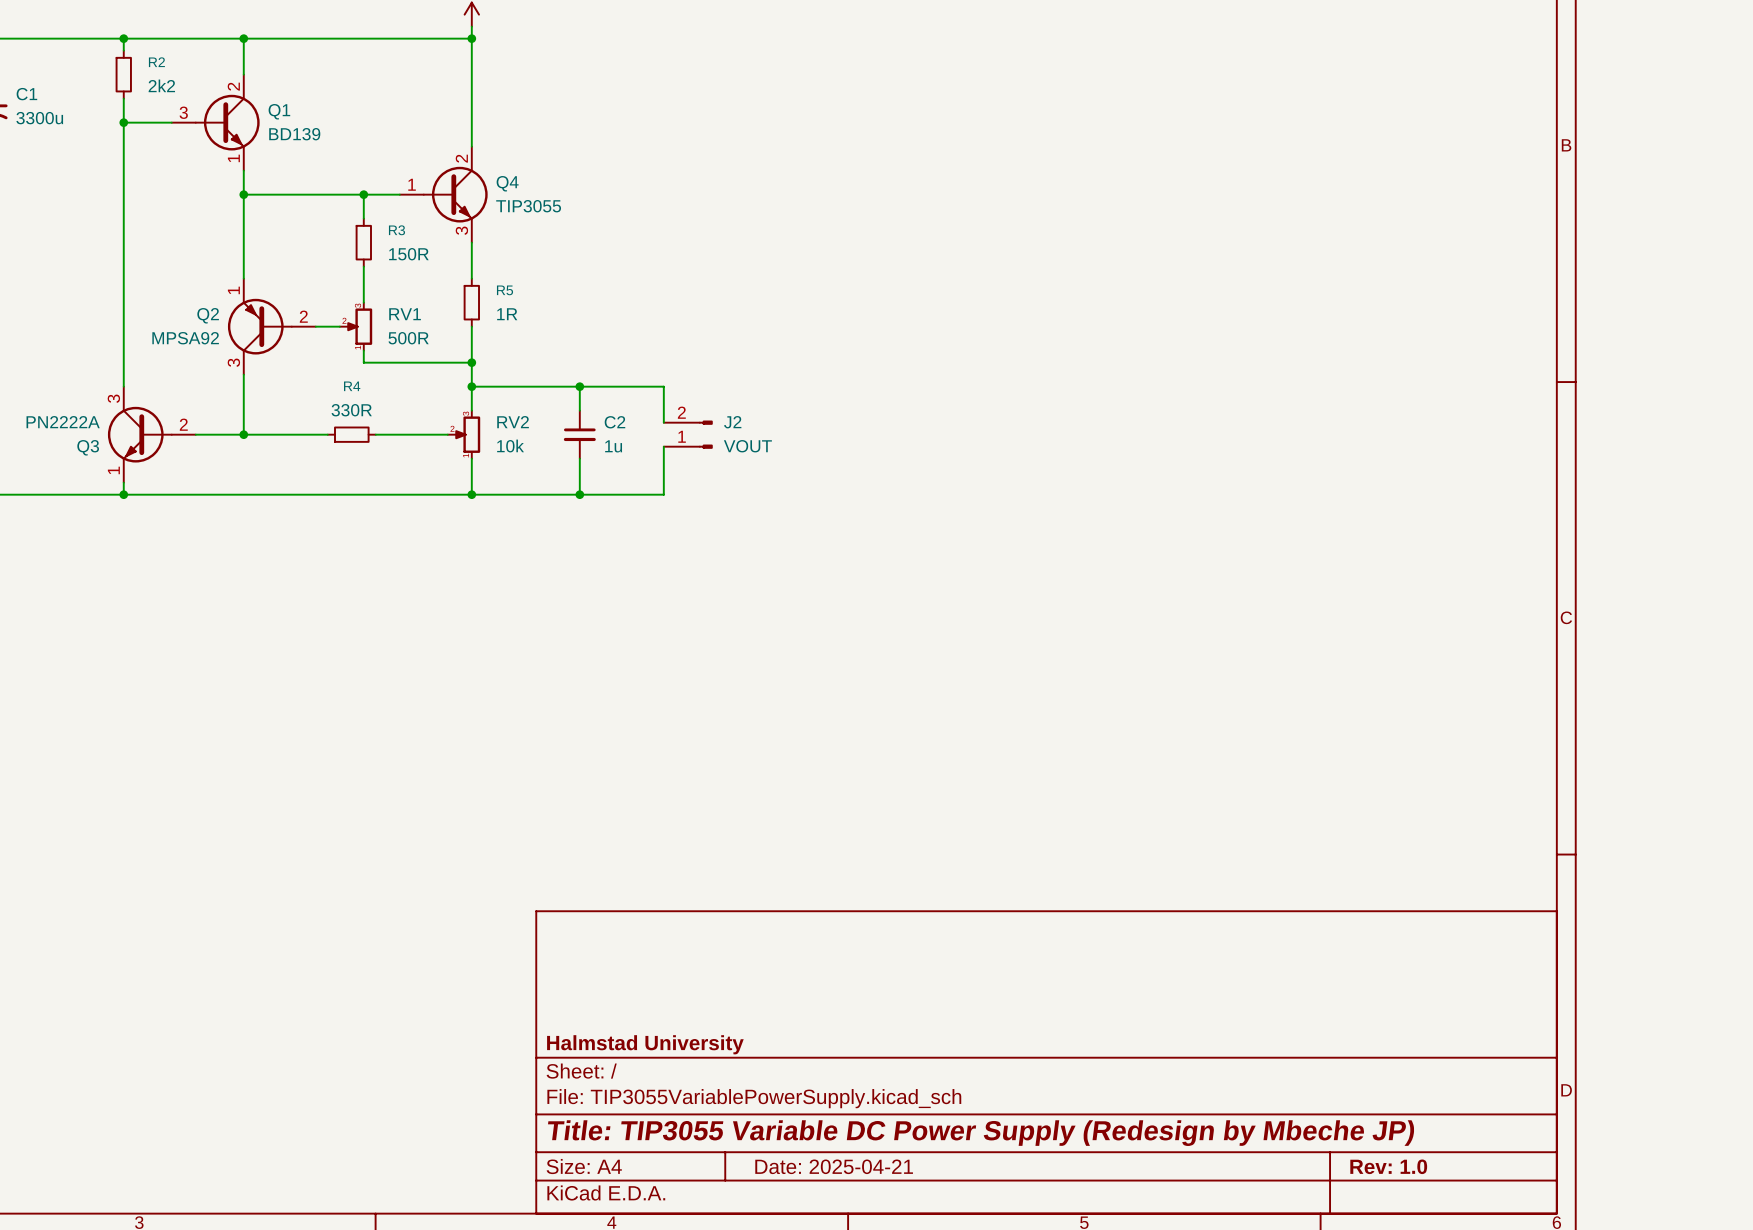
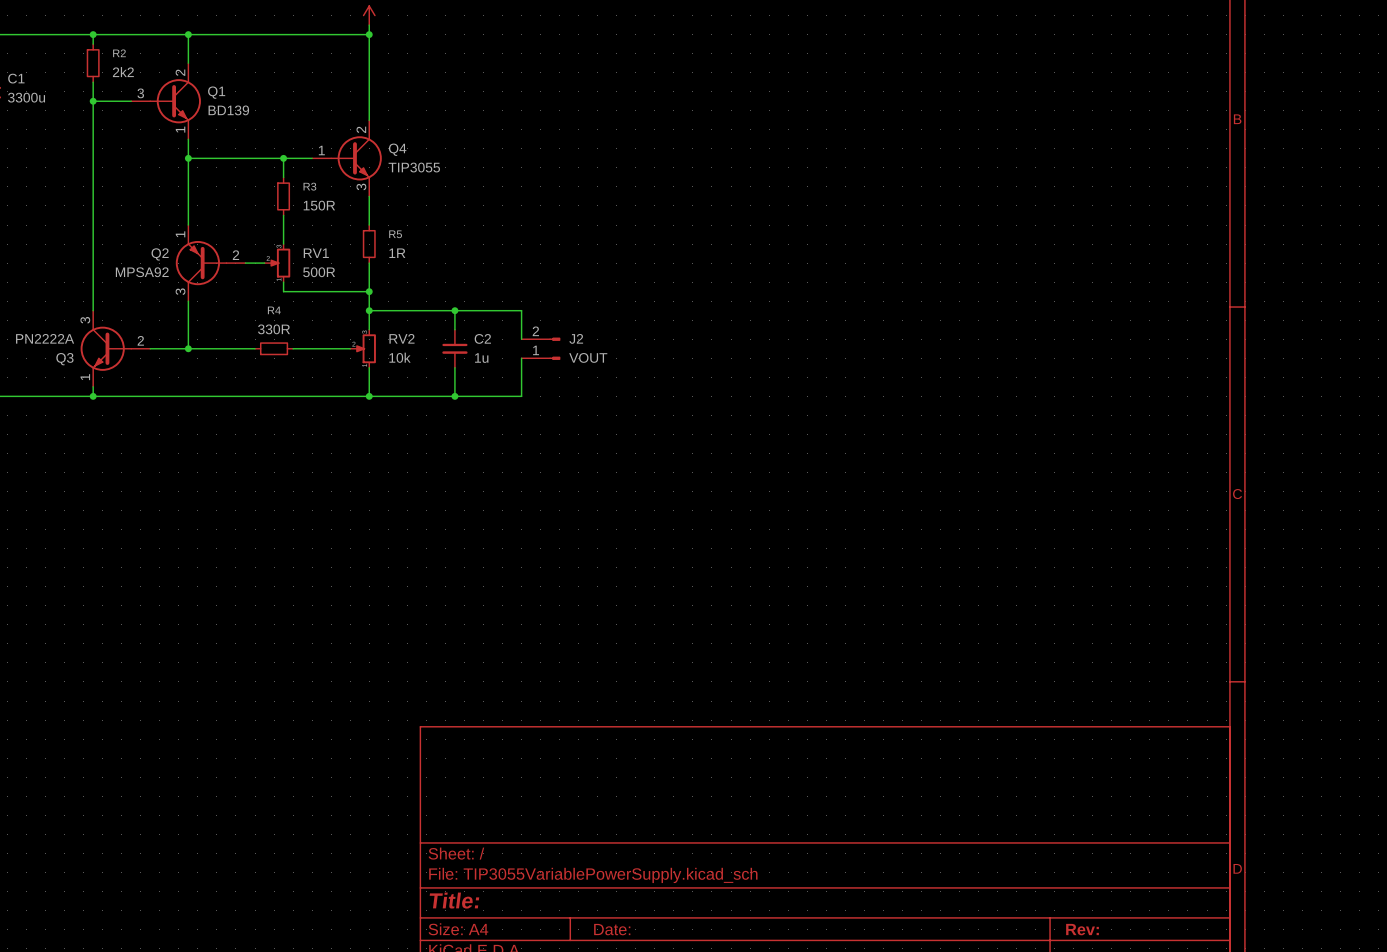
title block: Halmstad University (645, 1044) -> none
title block: Title: TIP3055 Variable DC Power Supply (Redesign by Mbeche JP) (981, 1133) -> Title: (454, 900)
title block: Date: 2025-04-21 (834, 1166) -> Date: (612, 929)
title block: Rev: 1.0 (1388, 1166) -> Rev: (1082, 929)

